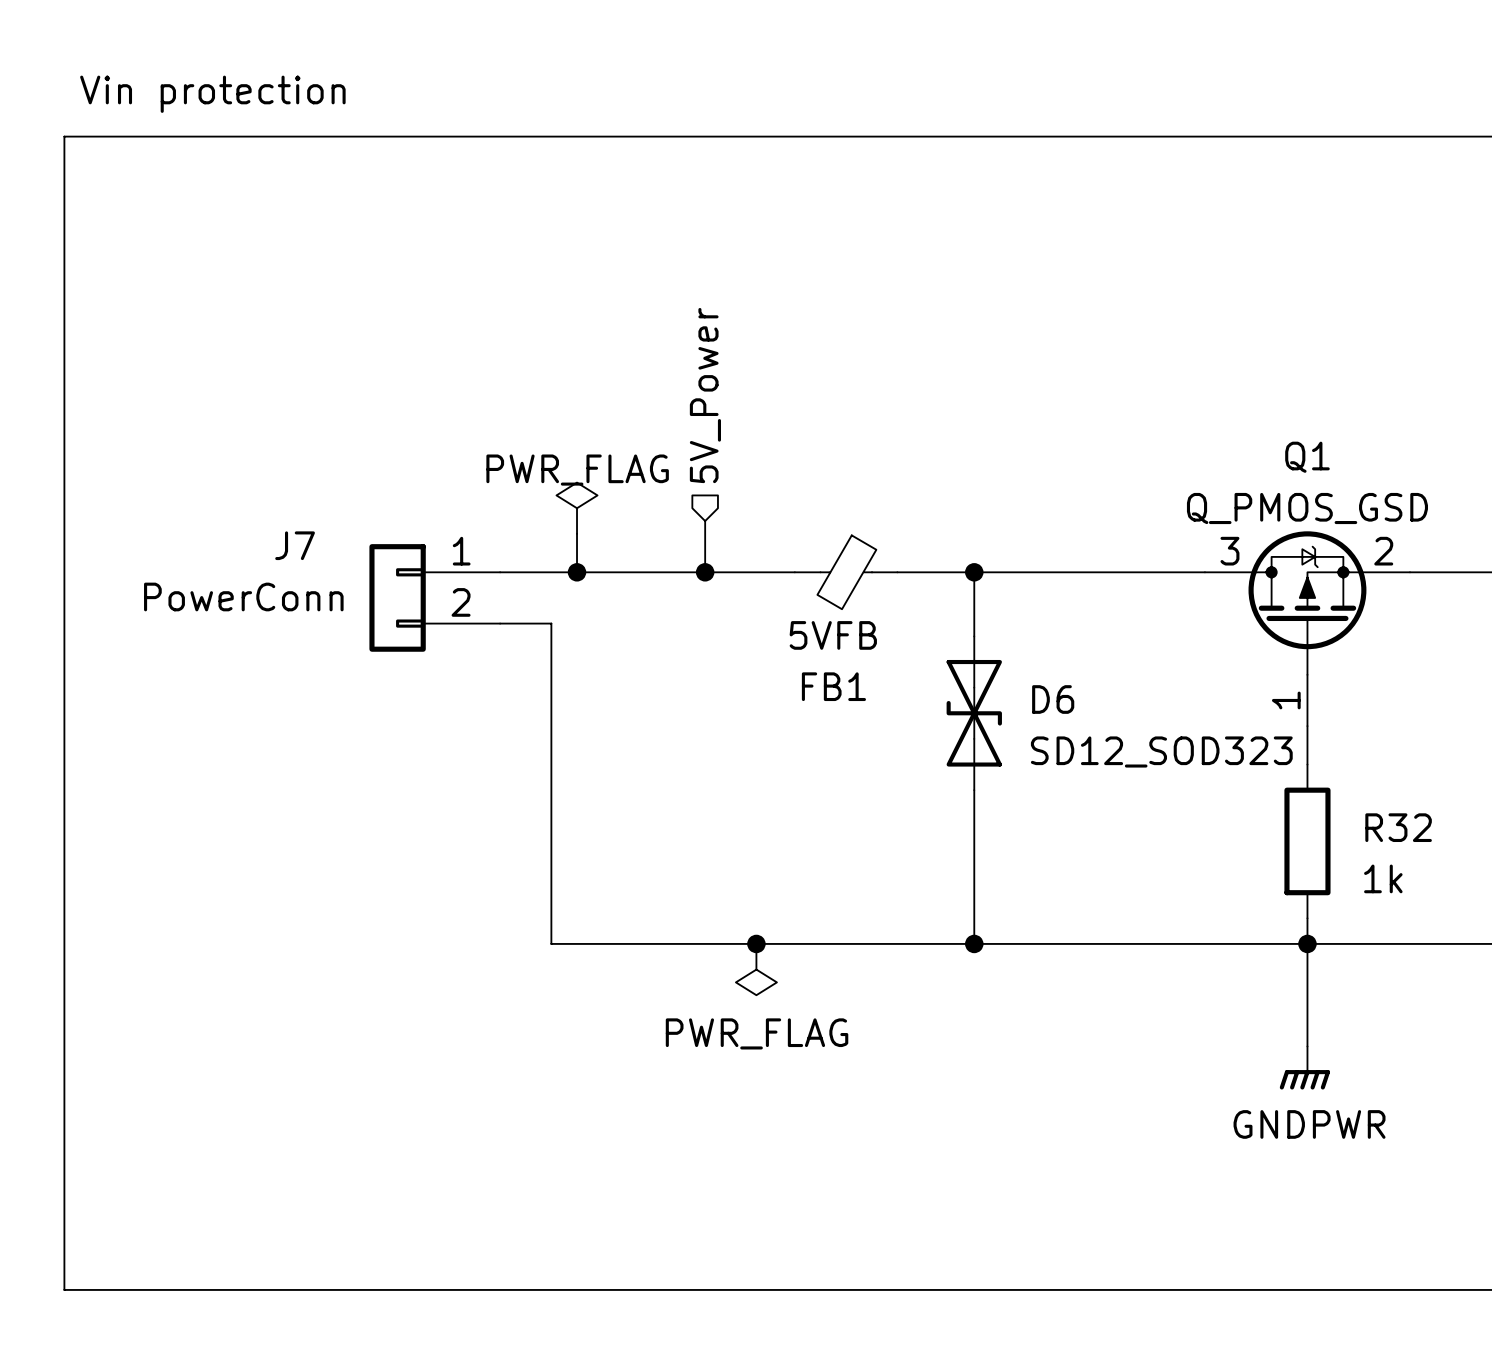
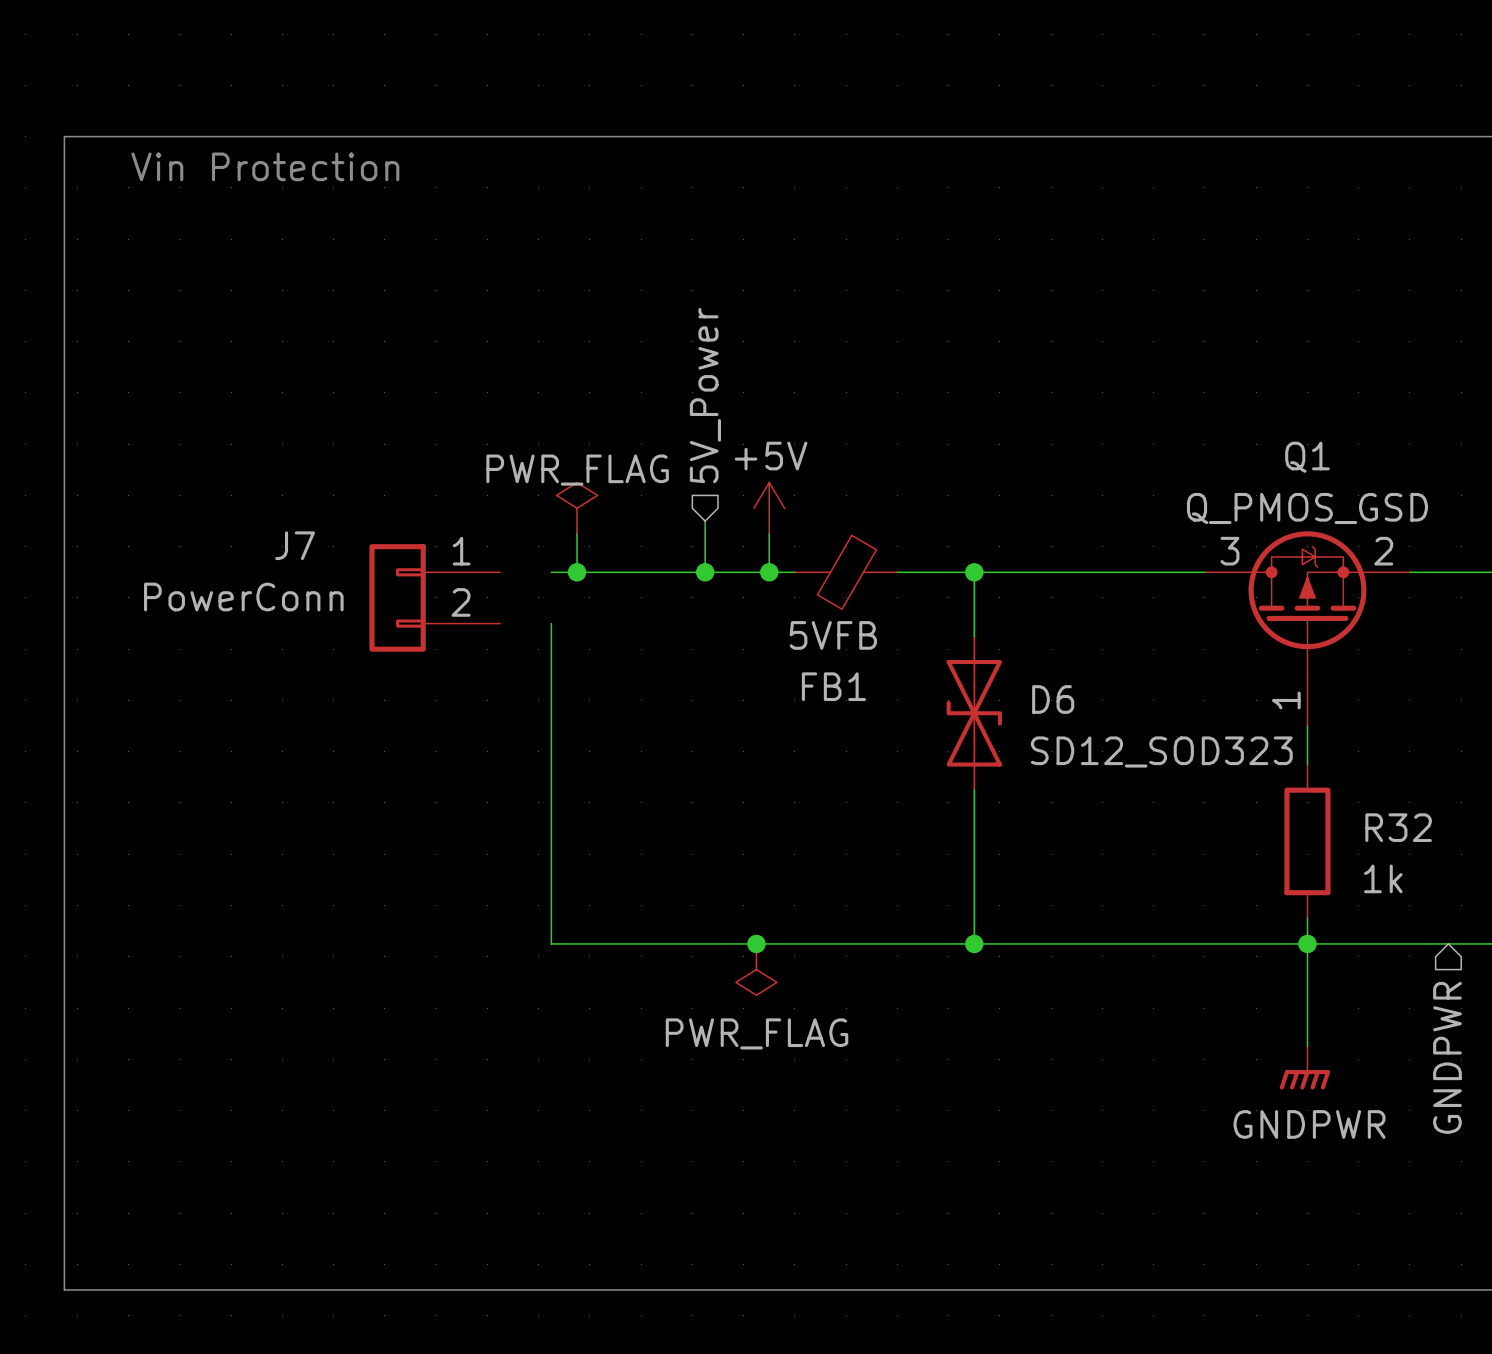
text: Vin protection (212, 94) -> none
text: none -> Vin Protection (265, 166)
power symbol: none -> +5V (769, 508)
wire: none -> (769, 533) (769, 572)
wire: (500, 572) (551, 572) -> none
junction: none -> (769, 572)
wire: (500, 623) (551, 623) -> none
hierarchical label: none -> GNDPWR (1447, 1057)

